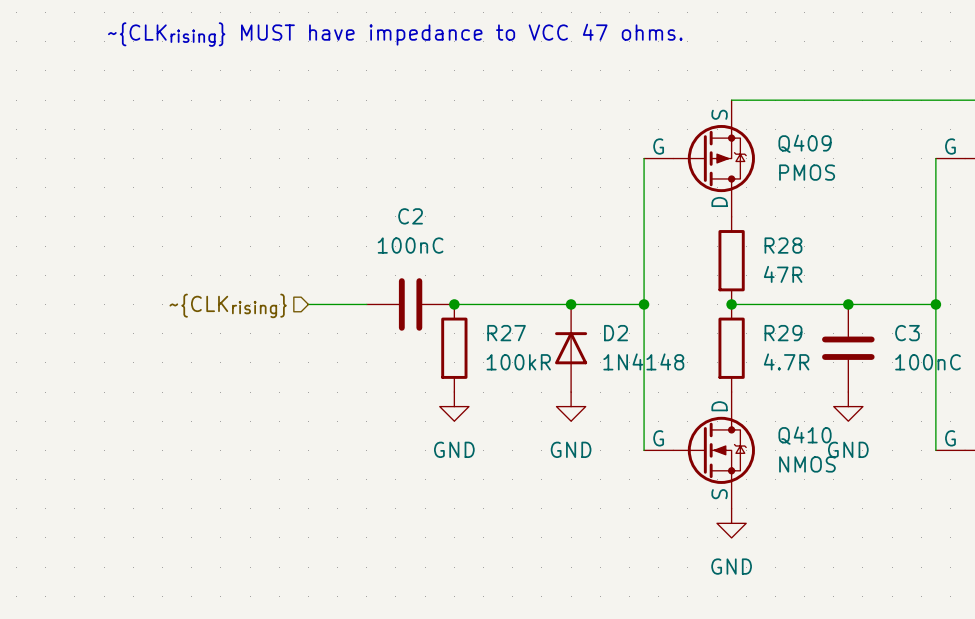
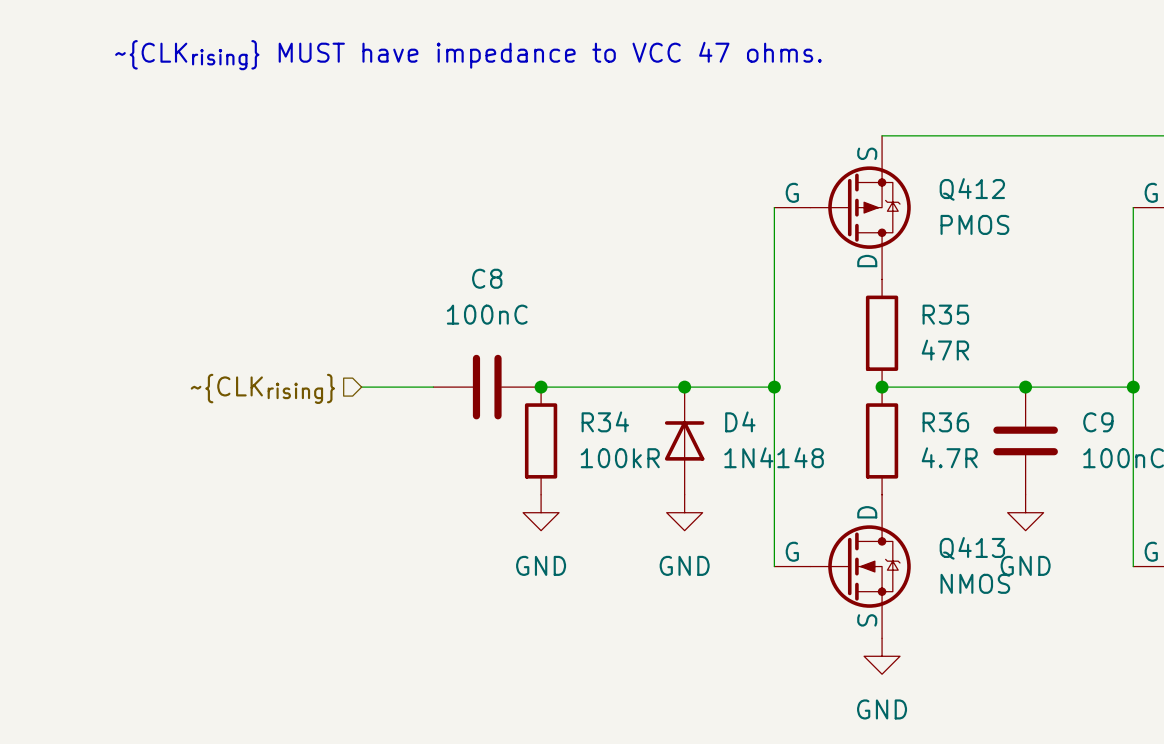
Q409 name: Q409 (805, 143) -> Q412 (972, 189)
C2 name: C2 (410, 216) -> C8 (487, 278)
R28 name: R28 (783, 245) -> R35 (945, 314)
R27 name: R27 (506, 333) -> R34 (605, 421)
D2 name: D2 (616, 333) -> D4 (740, 421)
R29 name: R29 (783, 333) -> R36 (945, 422)
C3 name: C3 (907, 333) -> C9 (1098, 422)
Q410 name: Q410 (805, 435) -> Q413 (972, 548)

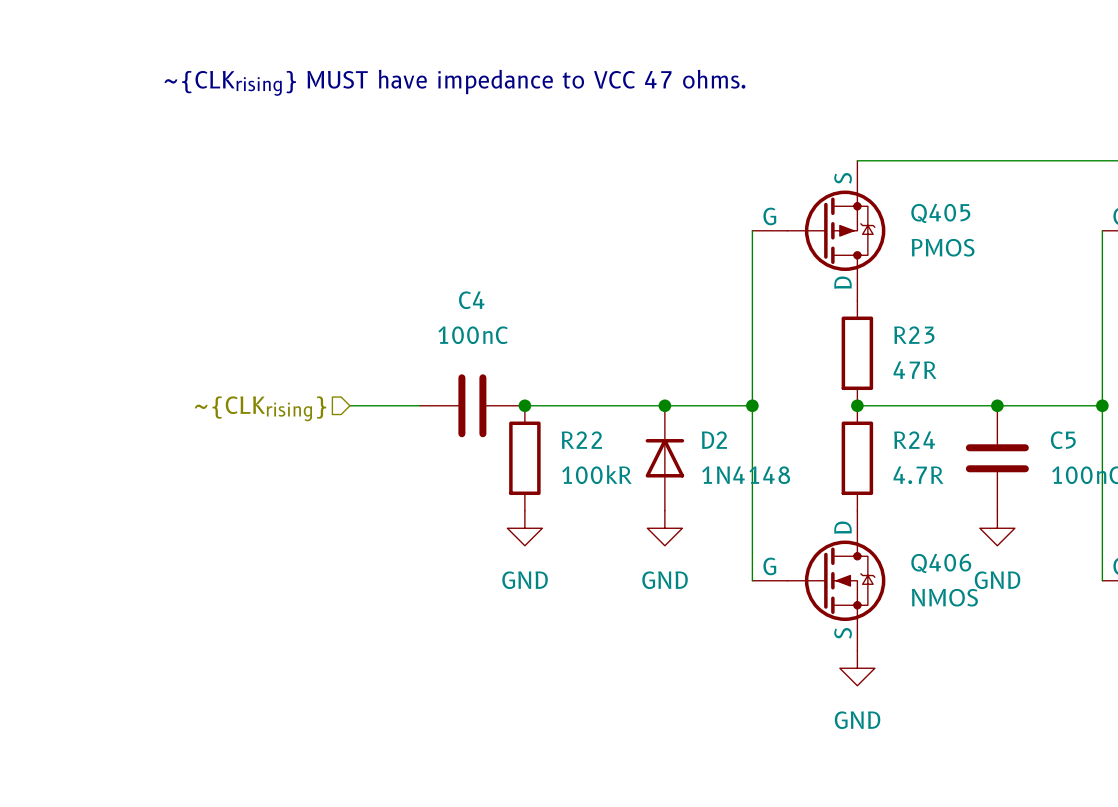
Q412 name: Q412 (972, 189) -> Q405 (940, 213)
C8 name: C8 (487, 278) -> C4 (471, 300)
R35 name: R35 (945, 314) -> R23 (914, 335)
R34 name: R34 (605, 421) -> R22 (581, 440)
D4 name: D4 (740, 421) -> D2 (714, 440)
R36 name: R36 (945, 422) -> R24 (914, 440)
C9 name: C9 (1098, 422) -> C5 (1063, 440)
Q413 name: Q413 (972, 548) -> Q406 (941, 563)

